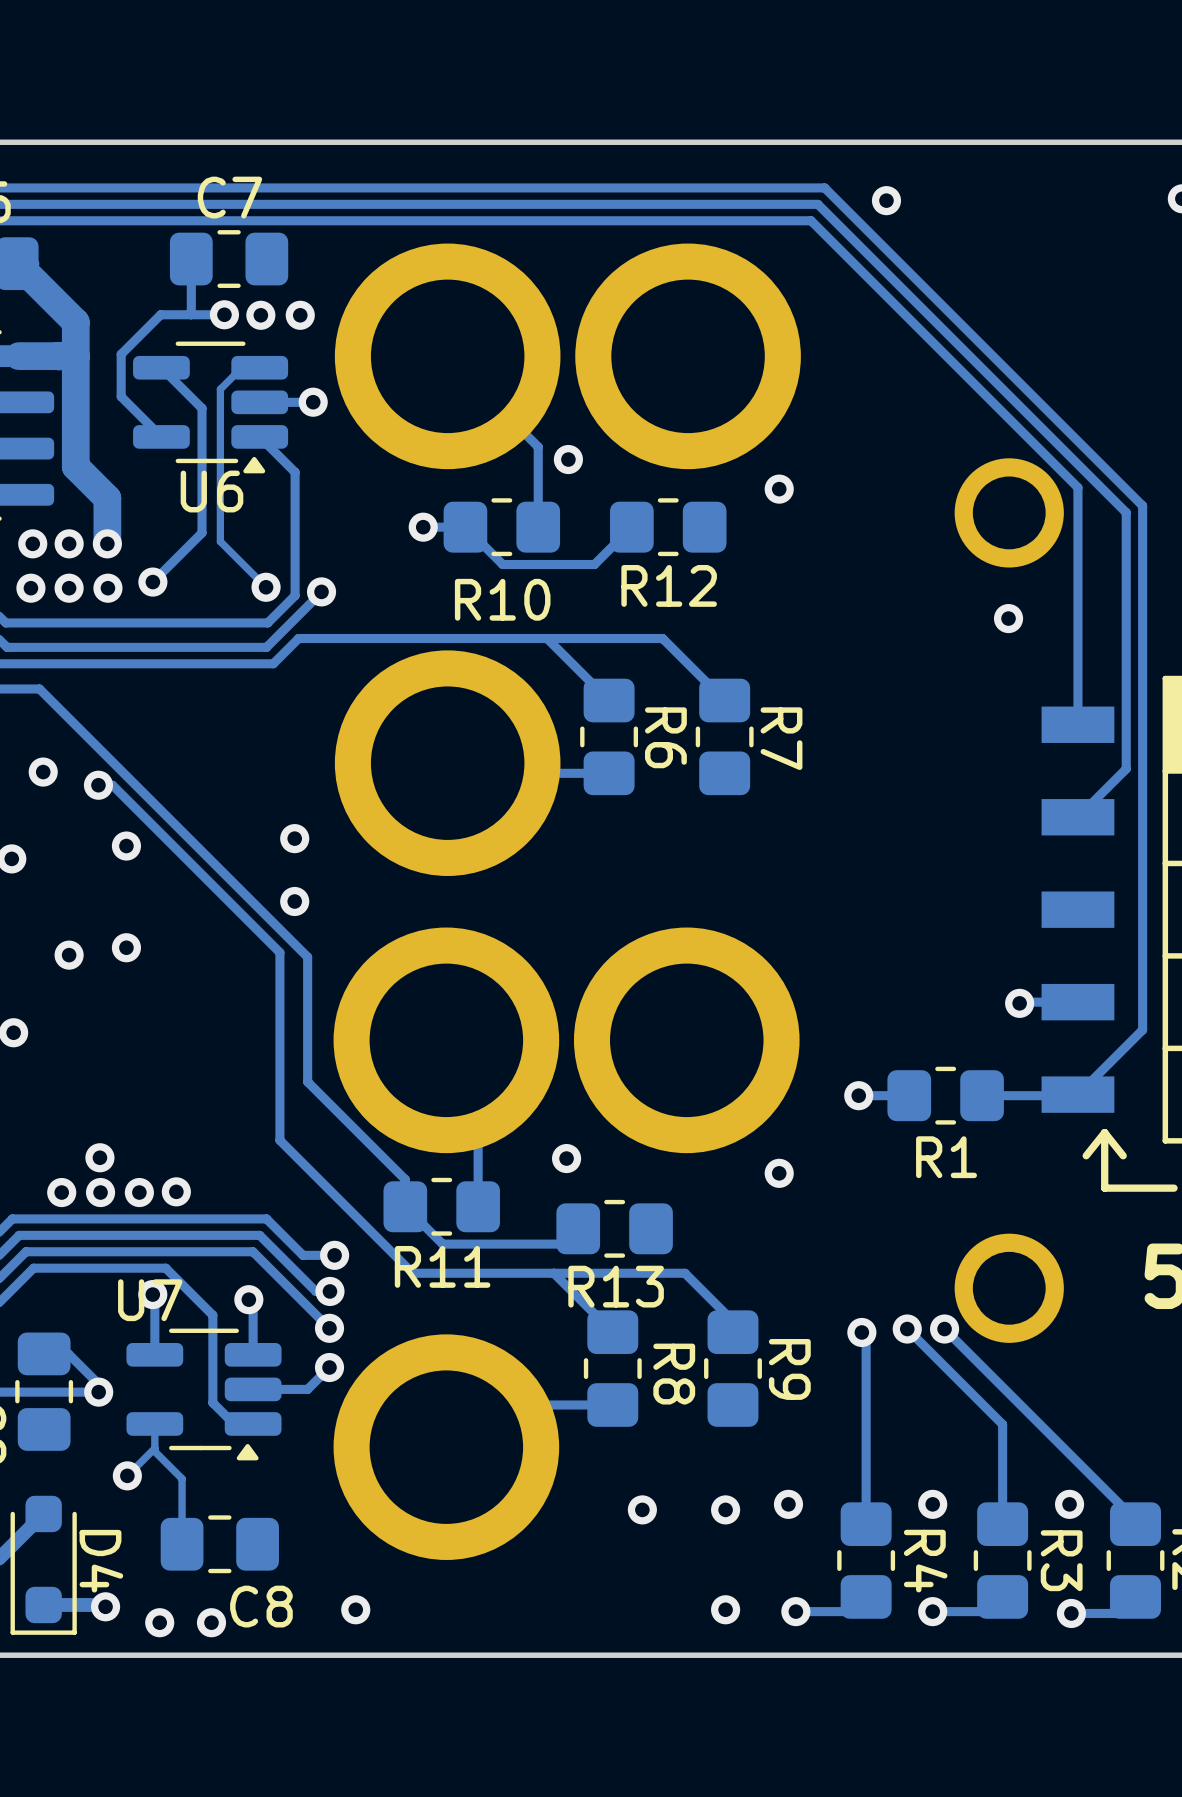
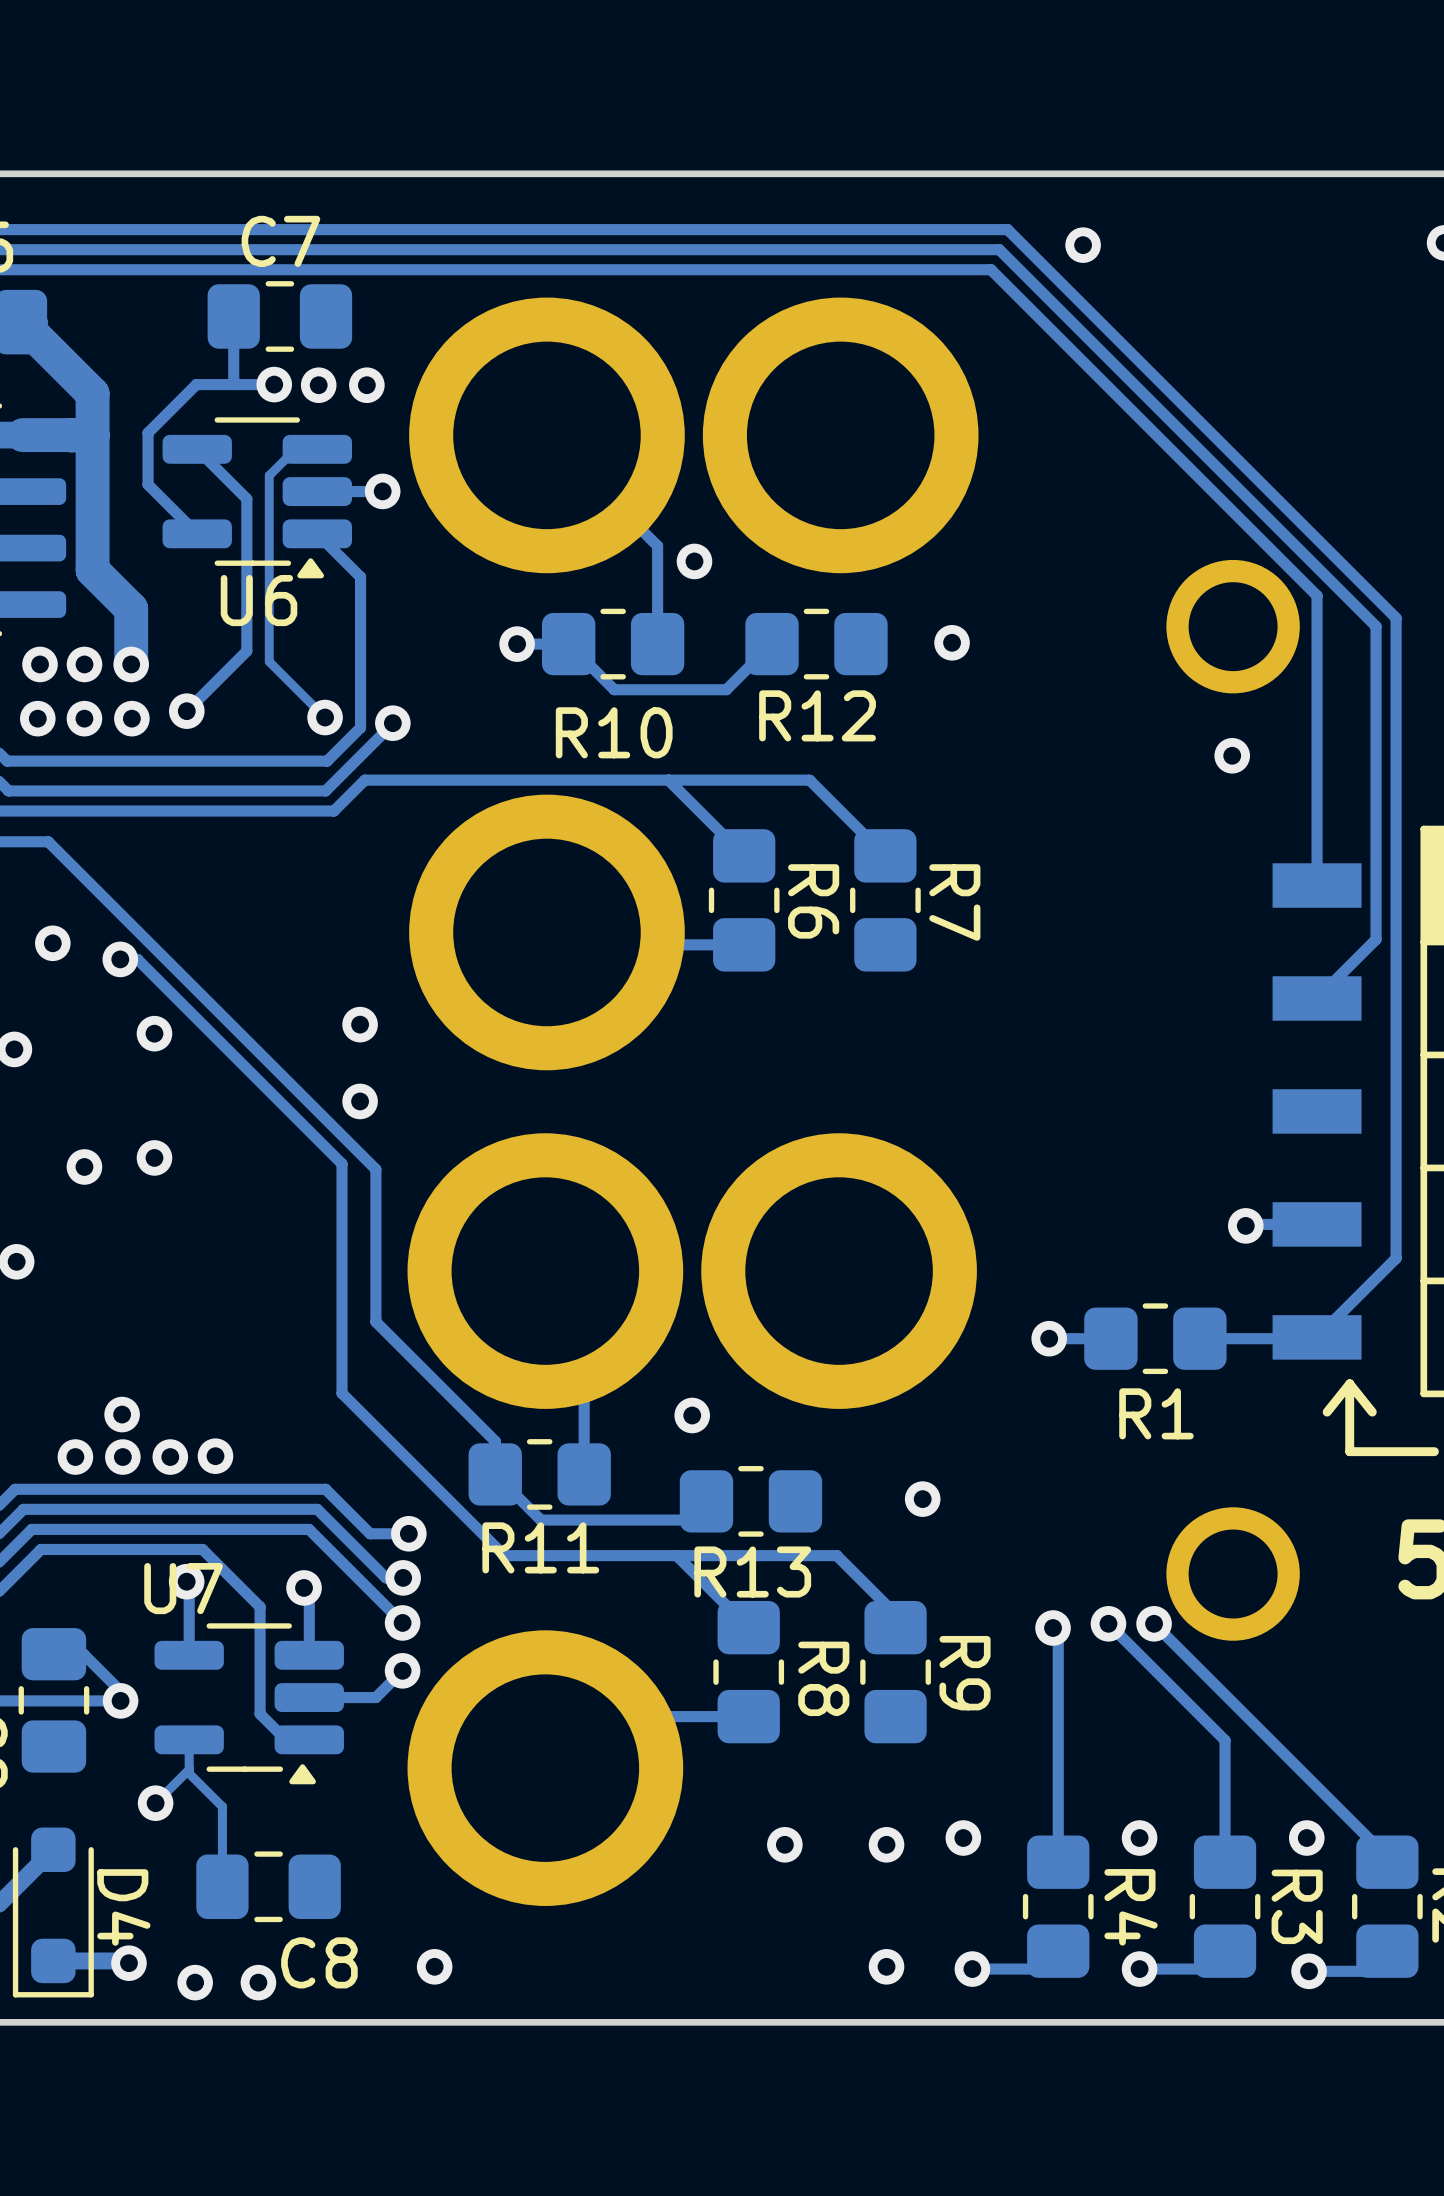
via position: (779, 489) -> (952, 642)
via position: (779, 1173) -> (922, 1499)

